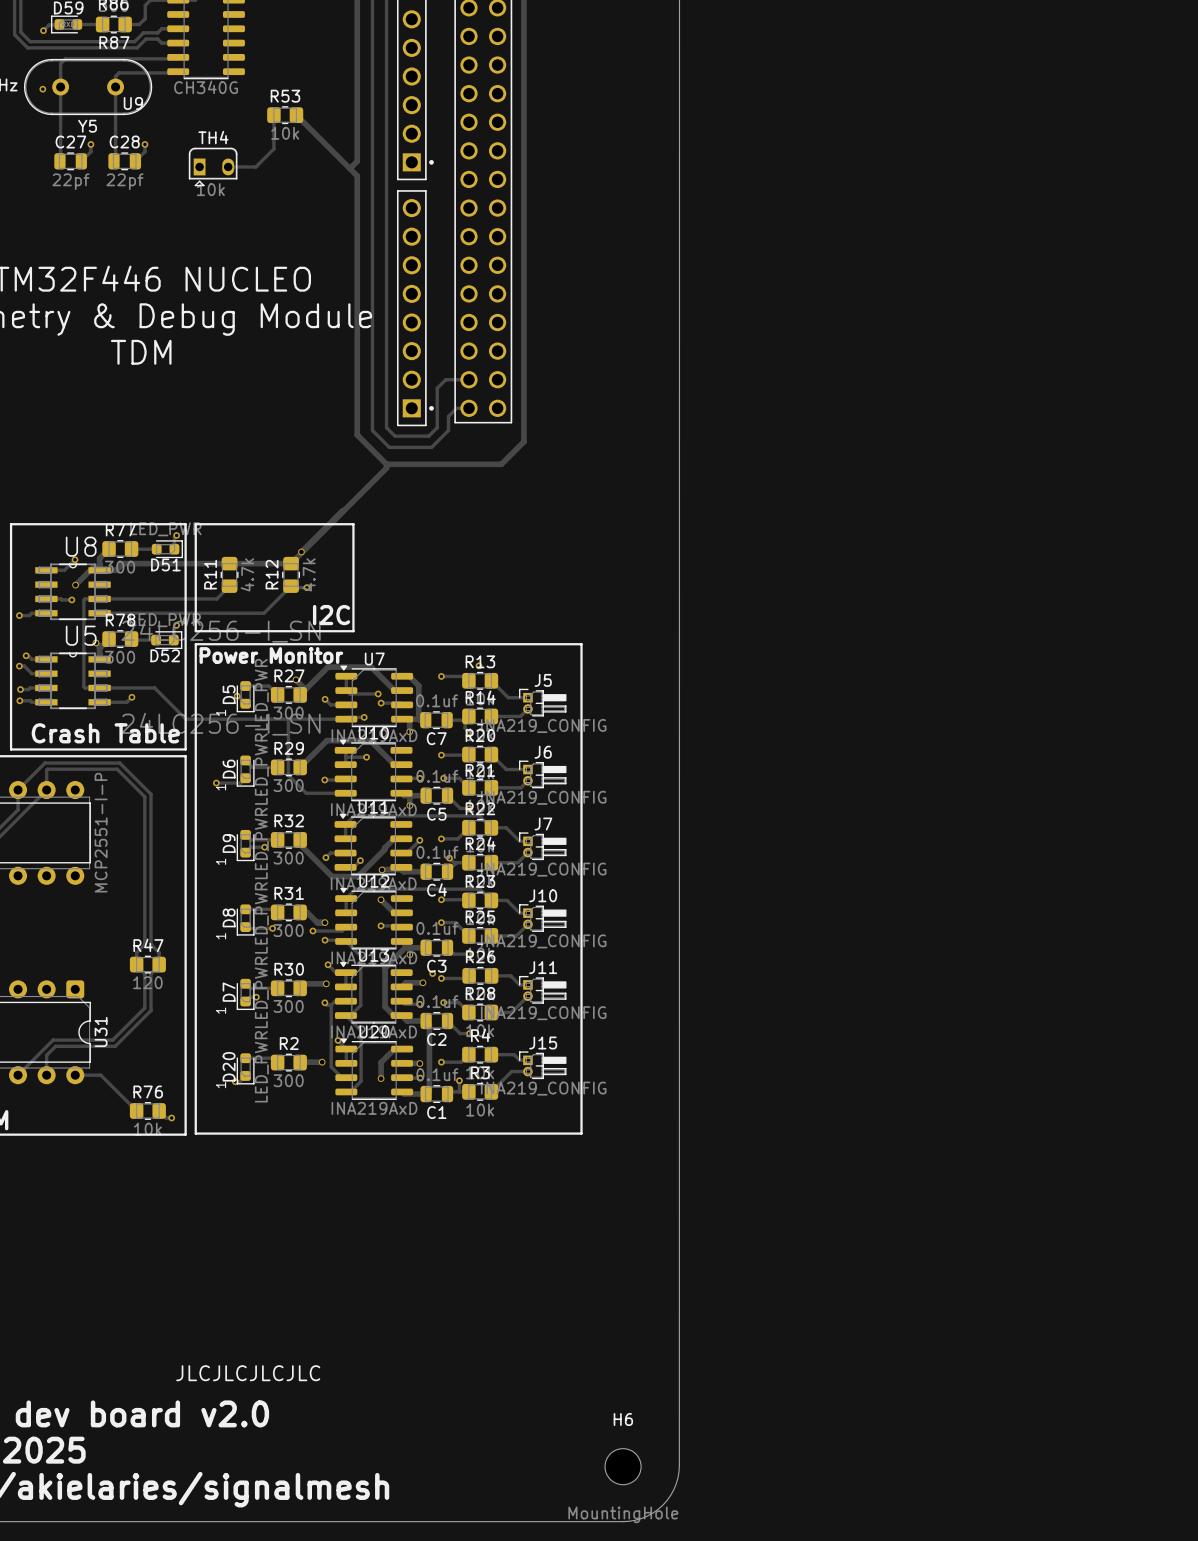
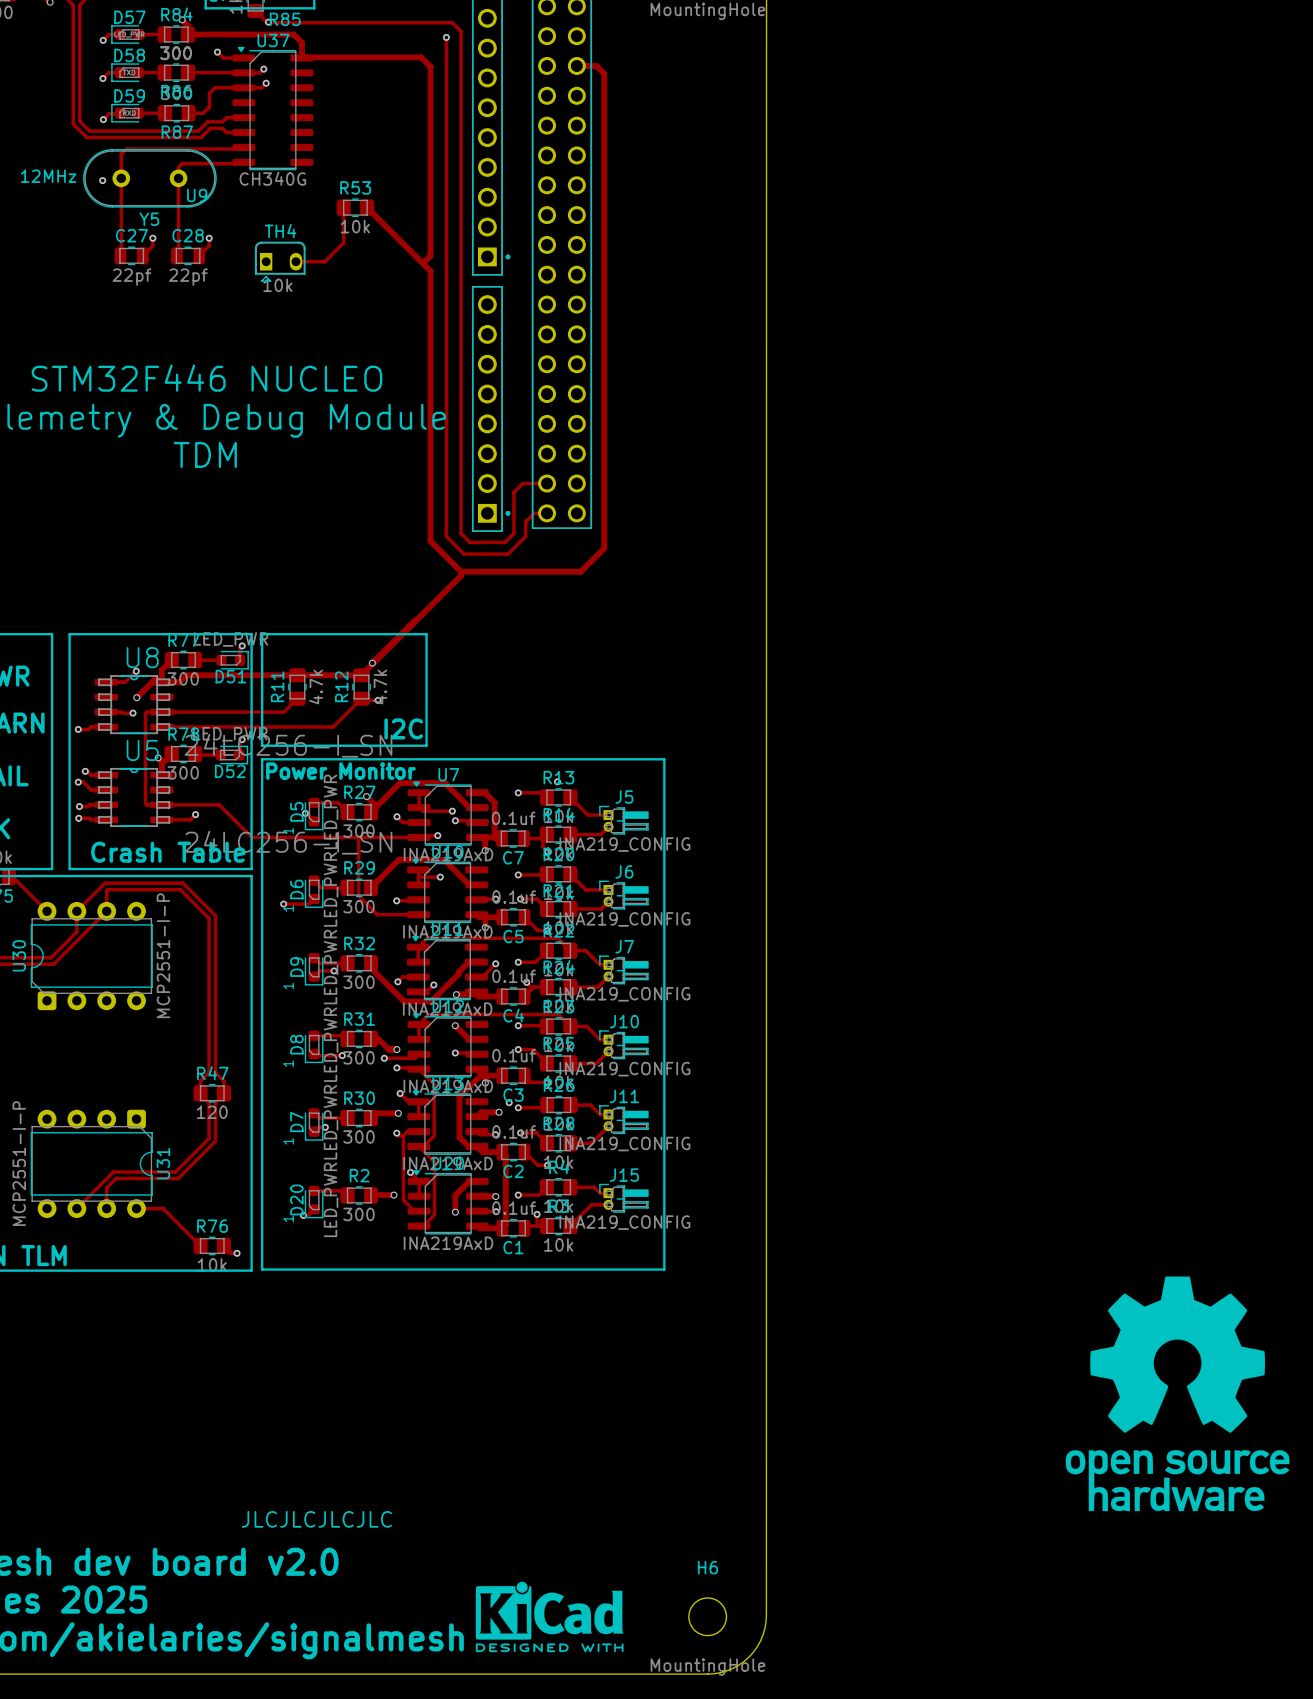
drawing: none -> [1065, 1276, 1290, 1512]
drawing: none -> [475, 1581, 624, 1653]

